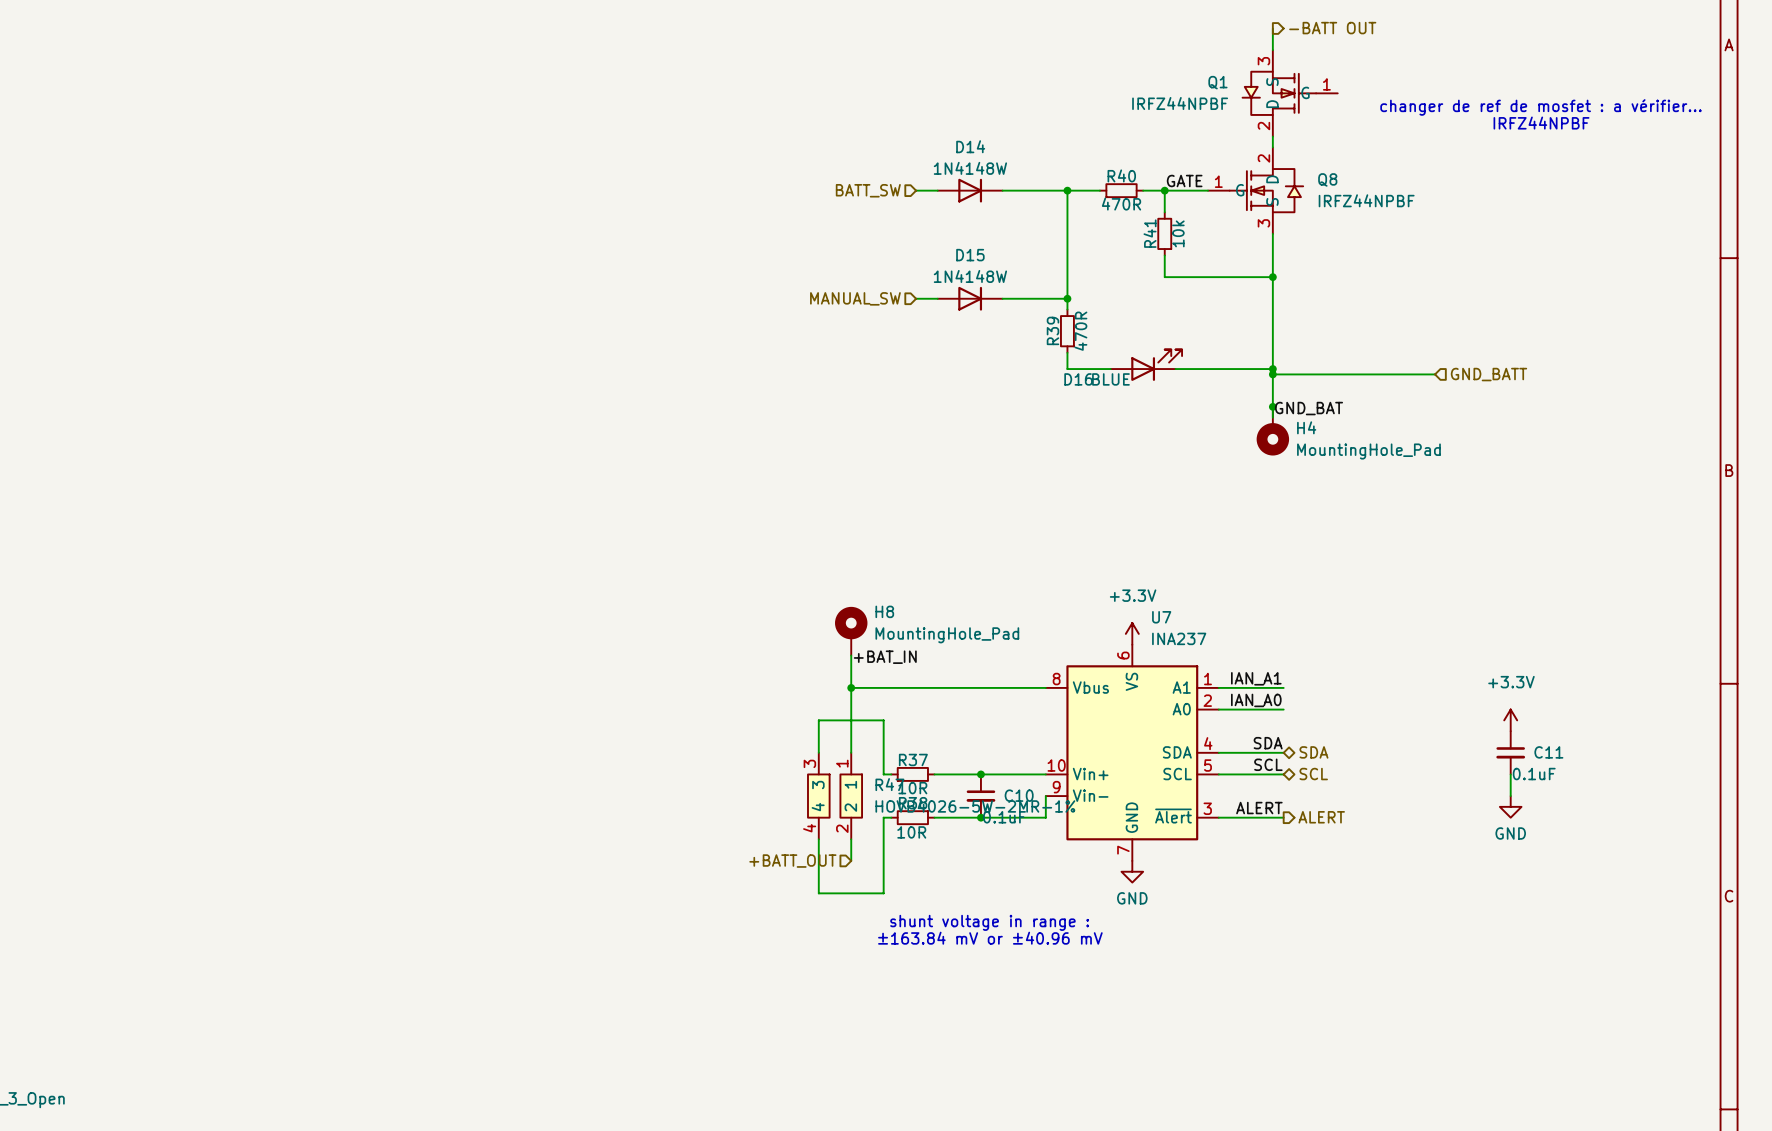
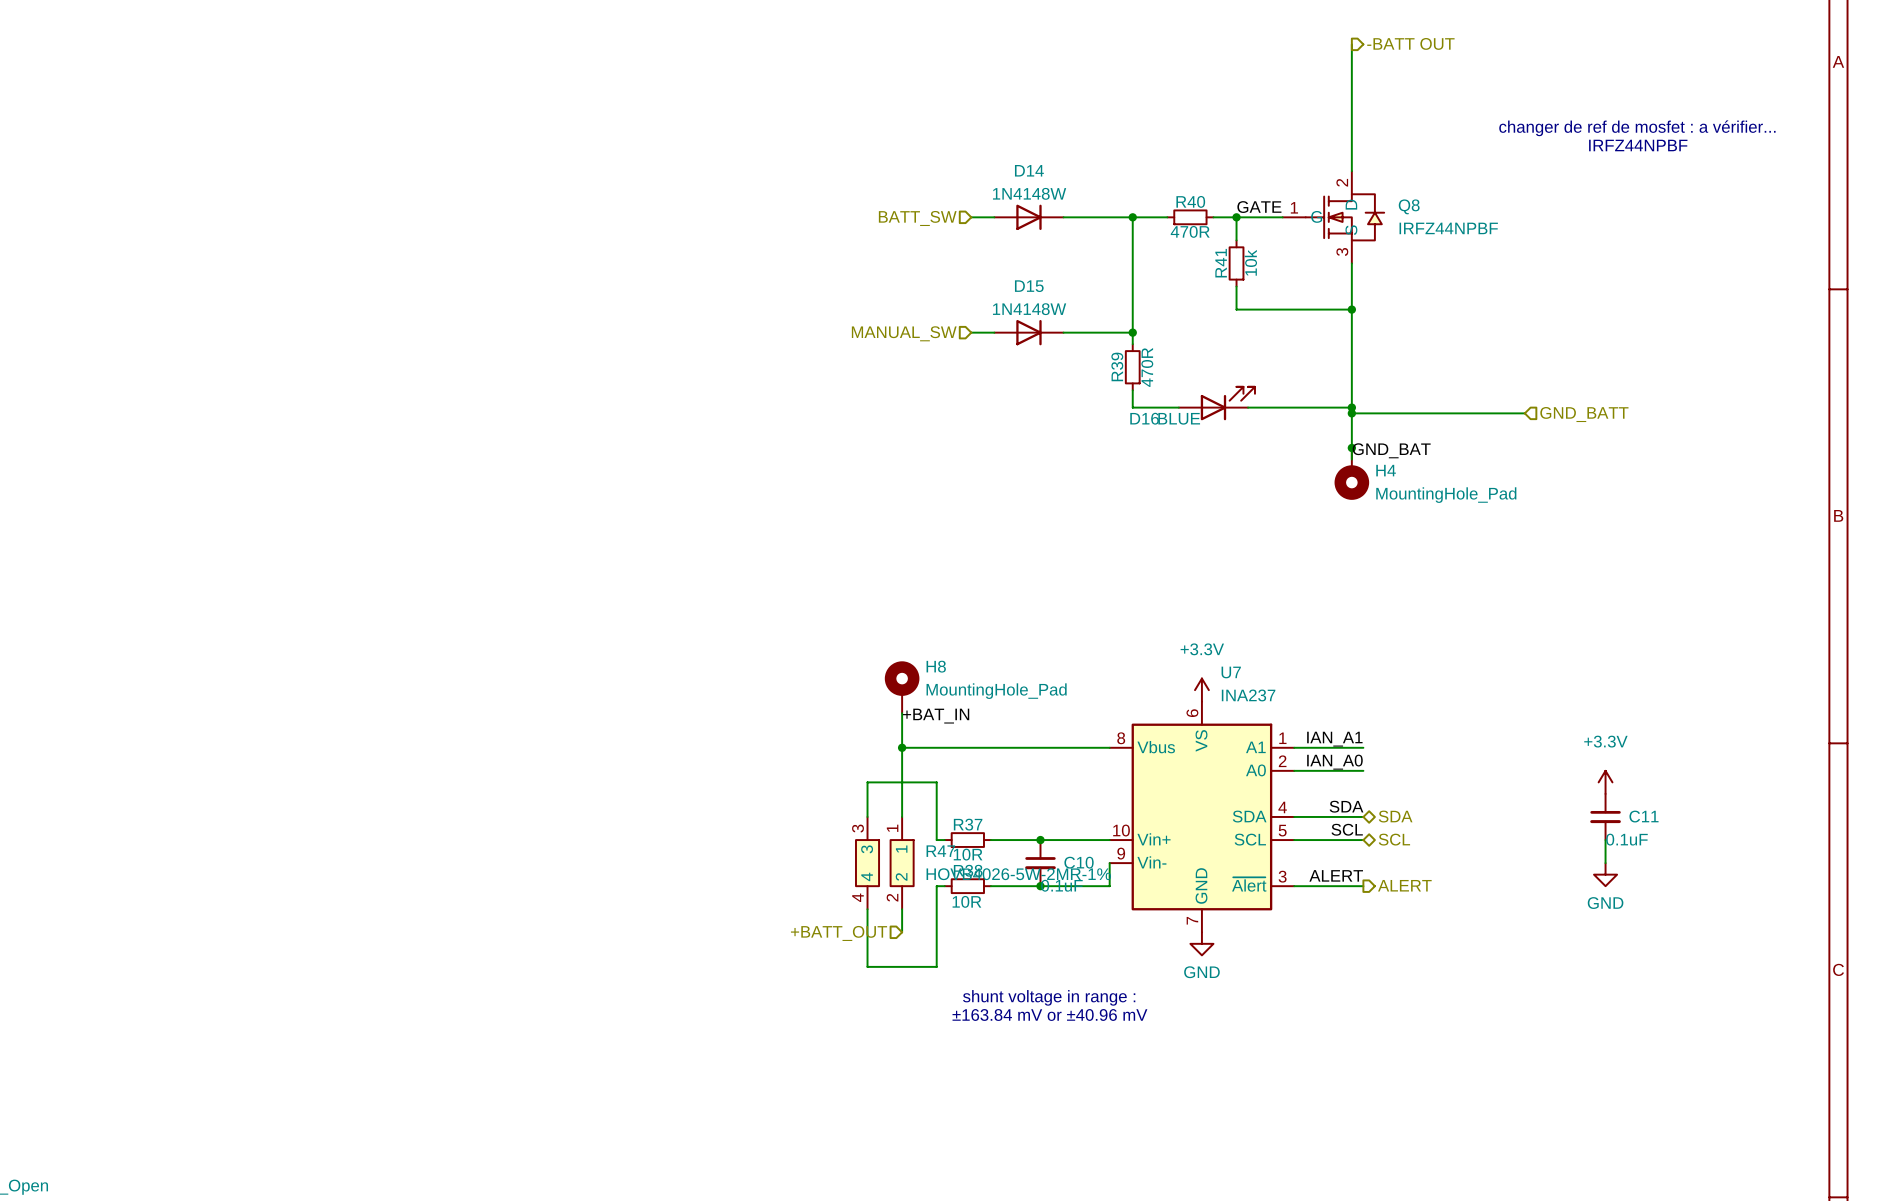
Q1: IRFZ44NPBF (1290, 93) -> none

